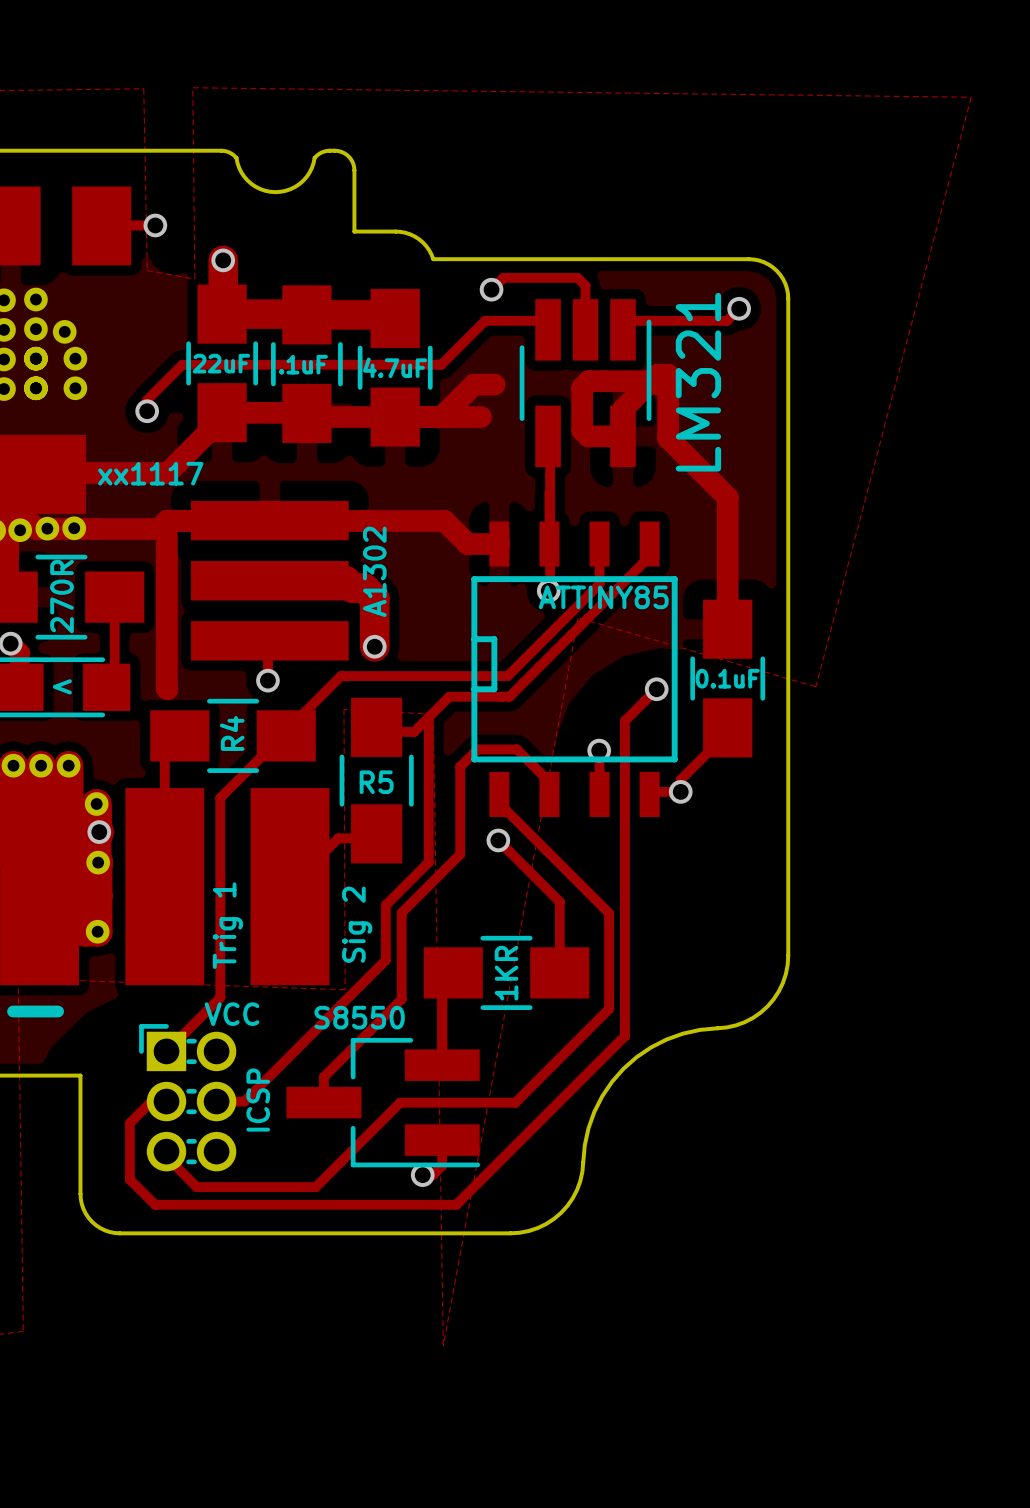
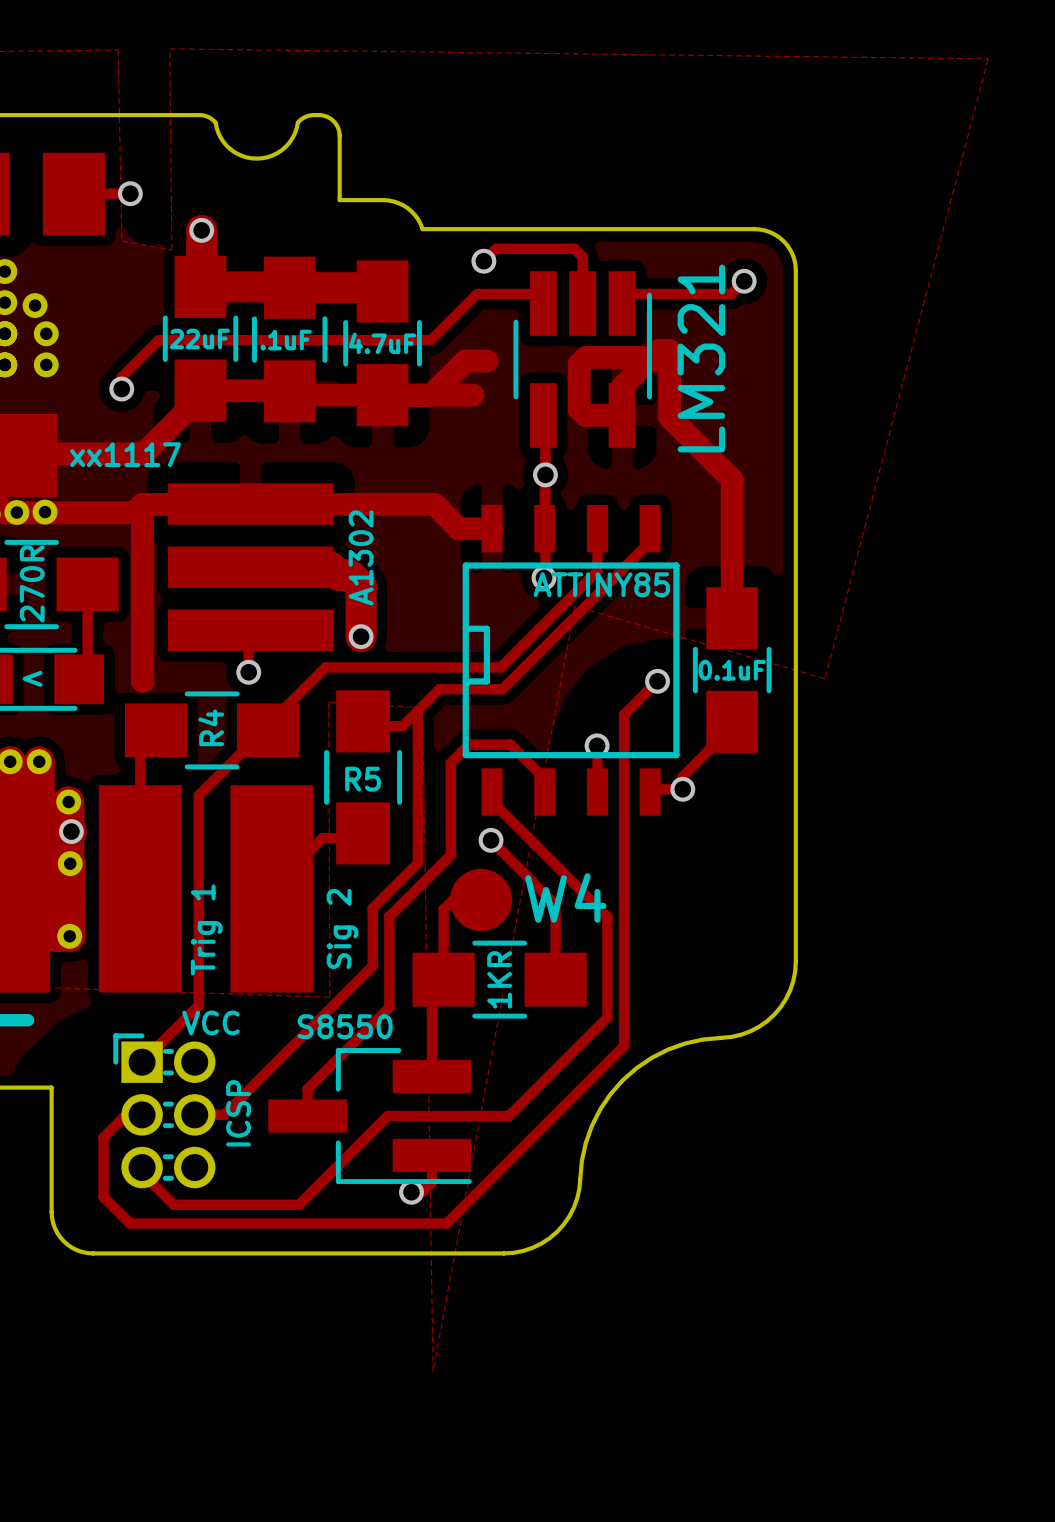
via: none -> (545, 474)
track: none -> (459, 893) (443, 909) (443, 979)
W4: none -> (481, 899)

